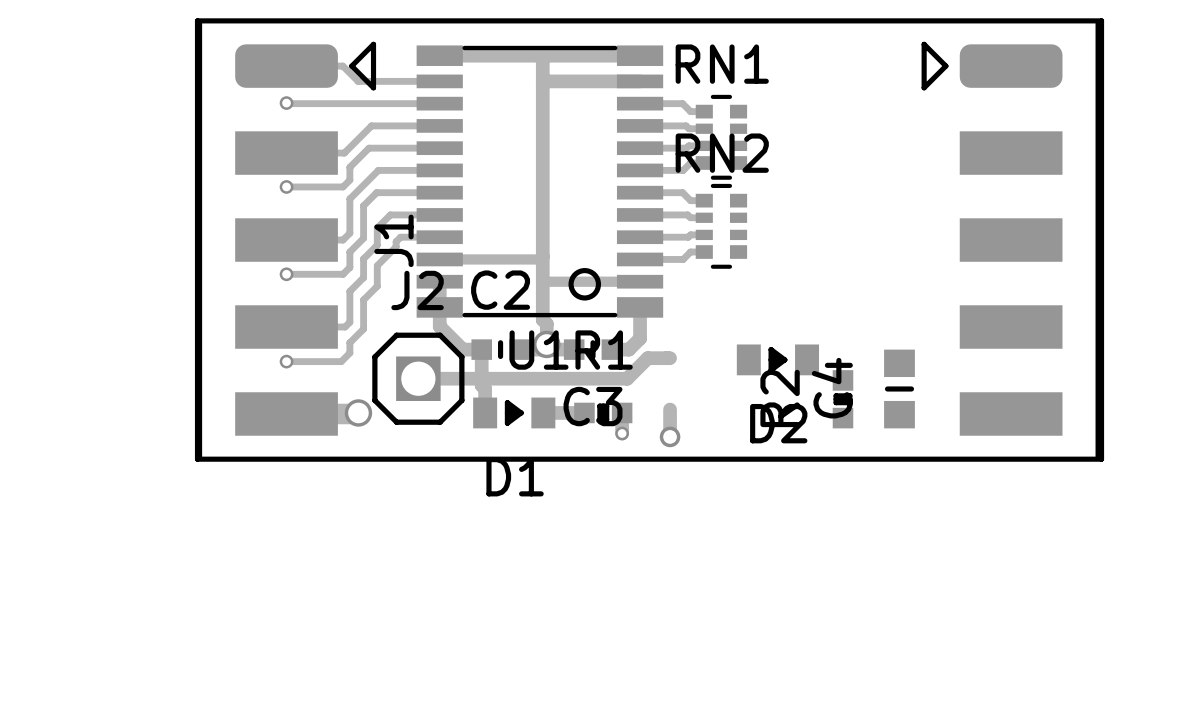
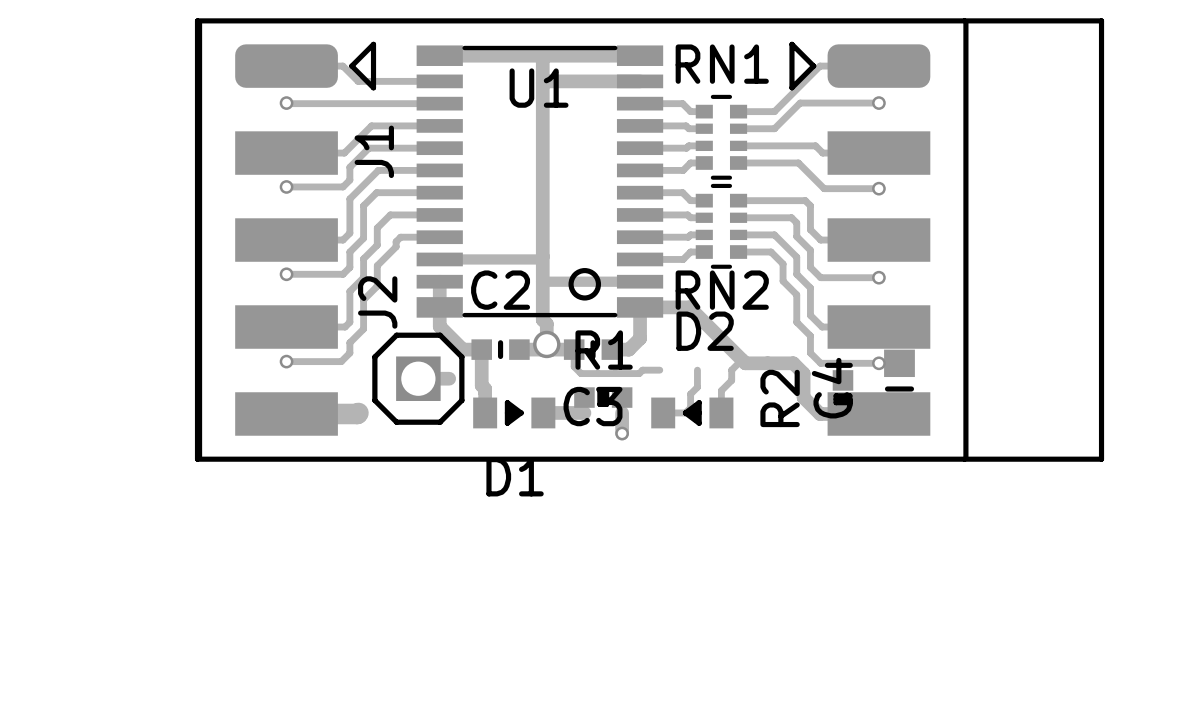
track: none -> (878, 66) (820, 66) (774, 111) (738, 111)
track: none -> (878, 103) (800, 103) (774, 128) (738, 128)
via: none -> (878, 103)
track: none -> (738, 145) (815, 145) (822, 153) (878, 153)
RN2 name position: RN2 (722, 153) -> RN2 (722, 290)
track: none -> (738, 162) (798, 162) (824, 188) (878, 188)
via: none -> (878, 188)
track: none -> (738, 200) (805, 200) (810, 205) (810, 229) (820, 240) (878, 240)
track: none -> (738, 217) (791, 217) (796, 222) (796, 236) (810, 250) (810, 267) (820, 277) (878, 277)
track: none -> (738, 234) (774, 234) (796, 257) (796, 274) (810, 287) (810, 315) (822, 327) (878, 327)
J1 name position: J1 (393, 240) -> J1 (374, 151)
part position: (1011, 240) -> (878, 240)
track: none -> (738, 252) (771, 252) (783, 264) (783, 281) (796, 294) (796, 322) (810, 335) (810, 353) (820, 363) (878, 363)
via: none -> (878, 277)
J2 name rotation: 0° (417, 290) -> 90° counterclockwise (377, 302)
track: none -> (640, 307) (689, 307) (745, 363) (793, 363) (803, 373) (803, 397) (820, 413) (878, 413)
track: none -> (574, 349) (574, 366) (581, 373) (639, 373) (642, 370) (659, 370)
U1 name position: U1 (539, 350) -> U1 (539, 88)
track: (670, 358) (647, 358) (627, 378) (485, 378) (481, 375) (478, 378) (449, 378) -> none
track: none -> (741, 359) (731, 370) (731, 380) (721, 390) (721, 412)
D2 rotation: 0° (777, 359) -> 180° (692, 412)
D2 position: (777, 359) -> (692, 412)
via: none -> (878, 363)
track: none -> (697, 370) (697, 387) (690, 394) (690, 407) (685, 412) (663, 412)
track: (670, 409) (670, 436) -> none
via: (358, 412) -> none
R1 position: (603, 412) -> (603, 397)
via: (670, 436) -> none

